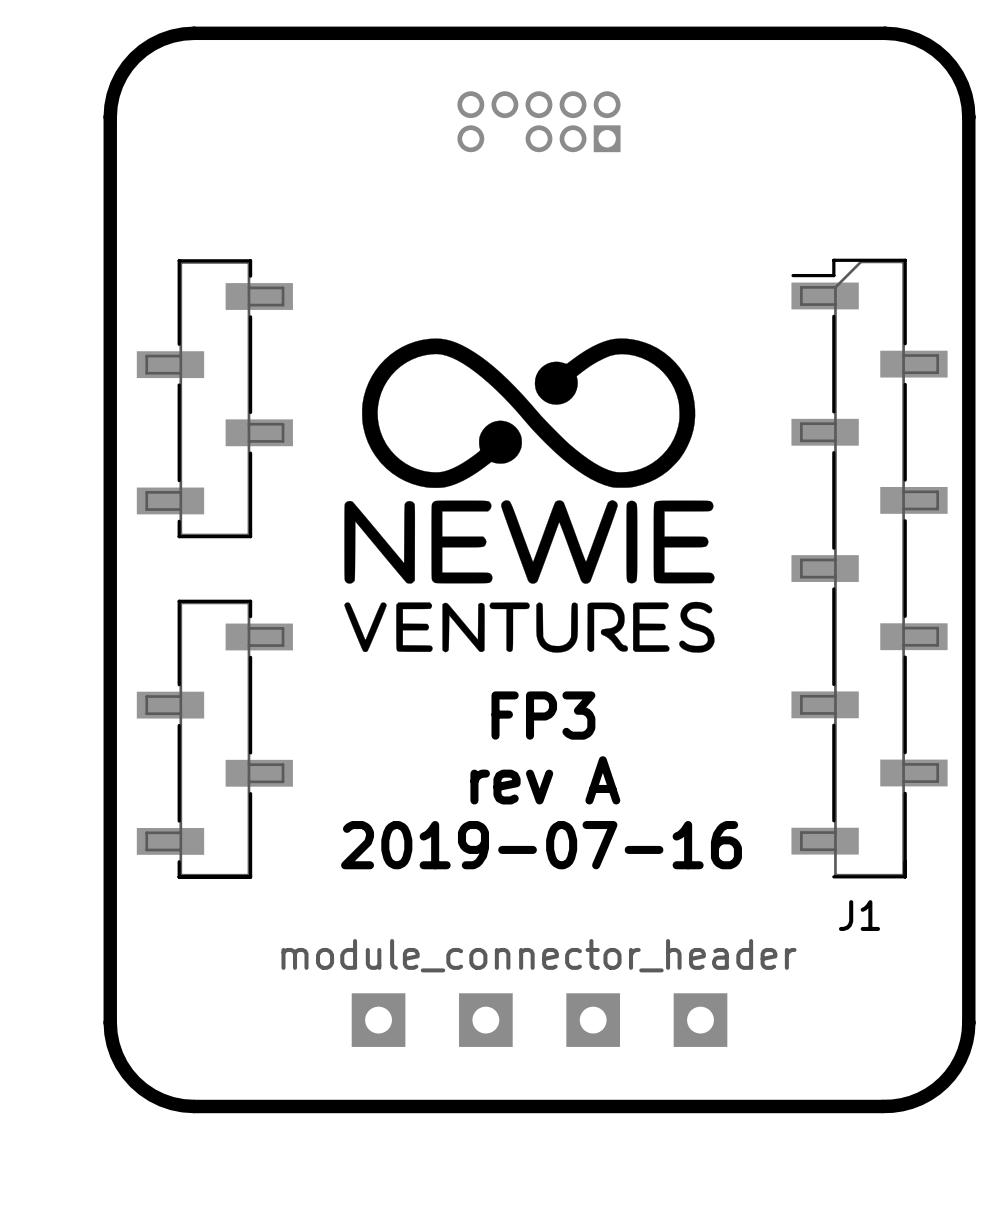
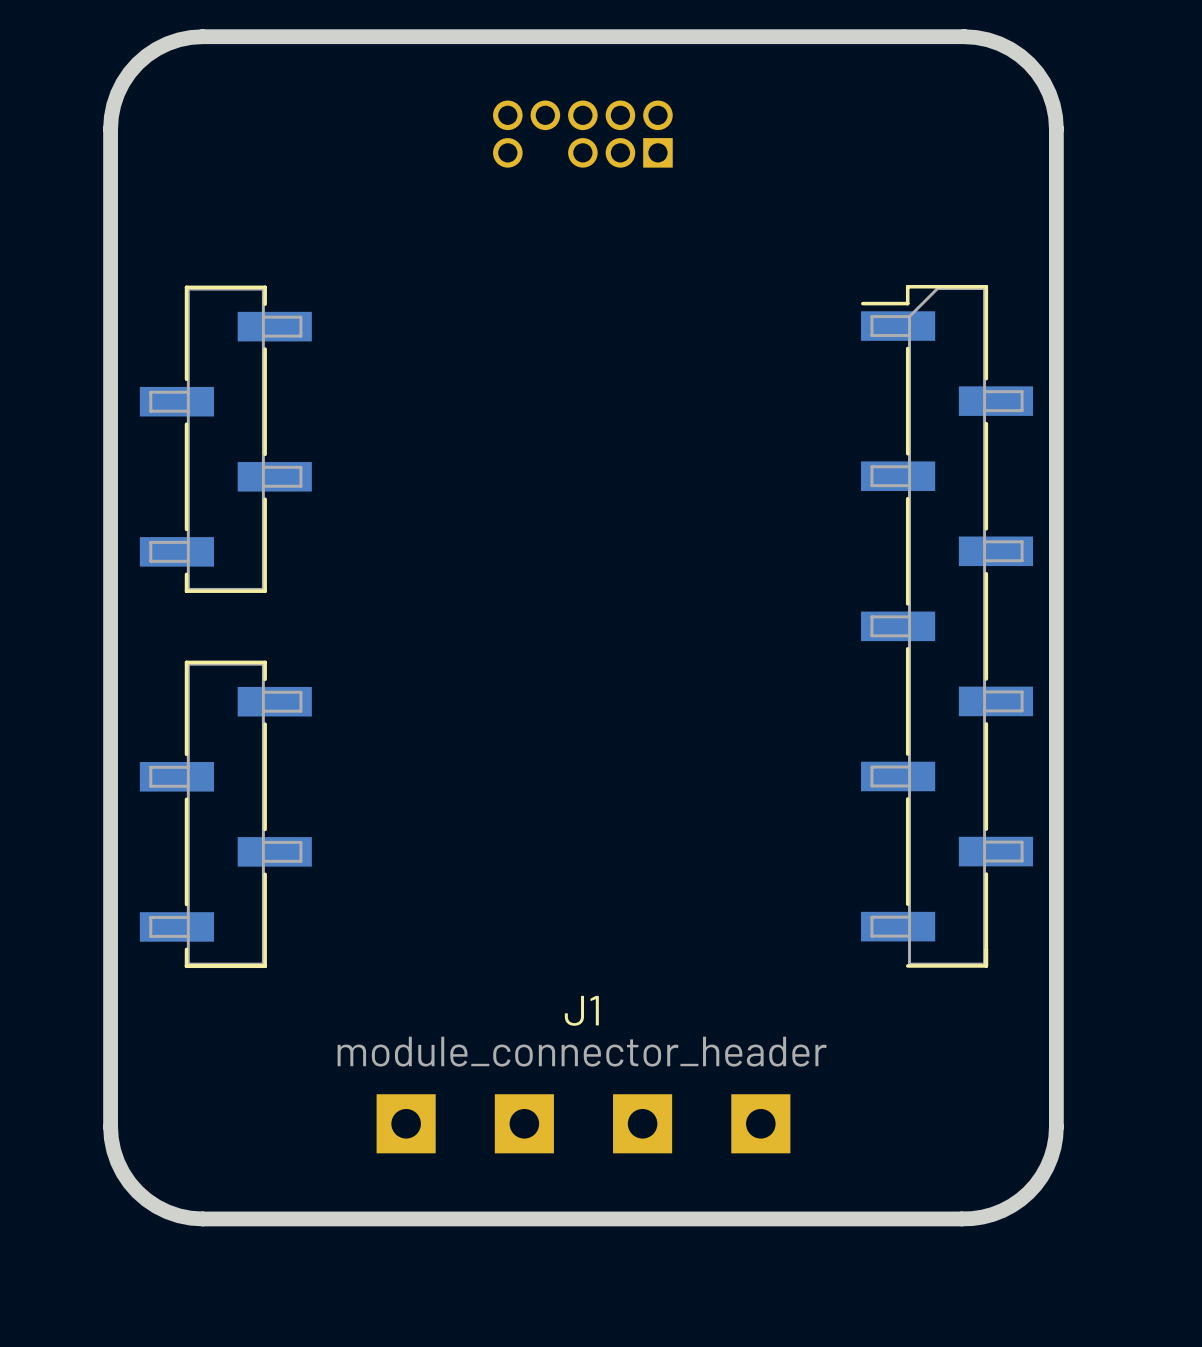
drawing: [344, 338, 715, 653] -> none
text: FP3 (543, 715) -> none
text: rev A (545, 780) -> none
text: 2019-07-16 (541, 845) -> none
J1 name position: J1 (859, 915) -> J1 (581, 1010)

